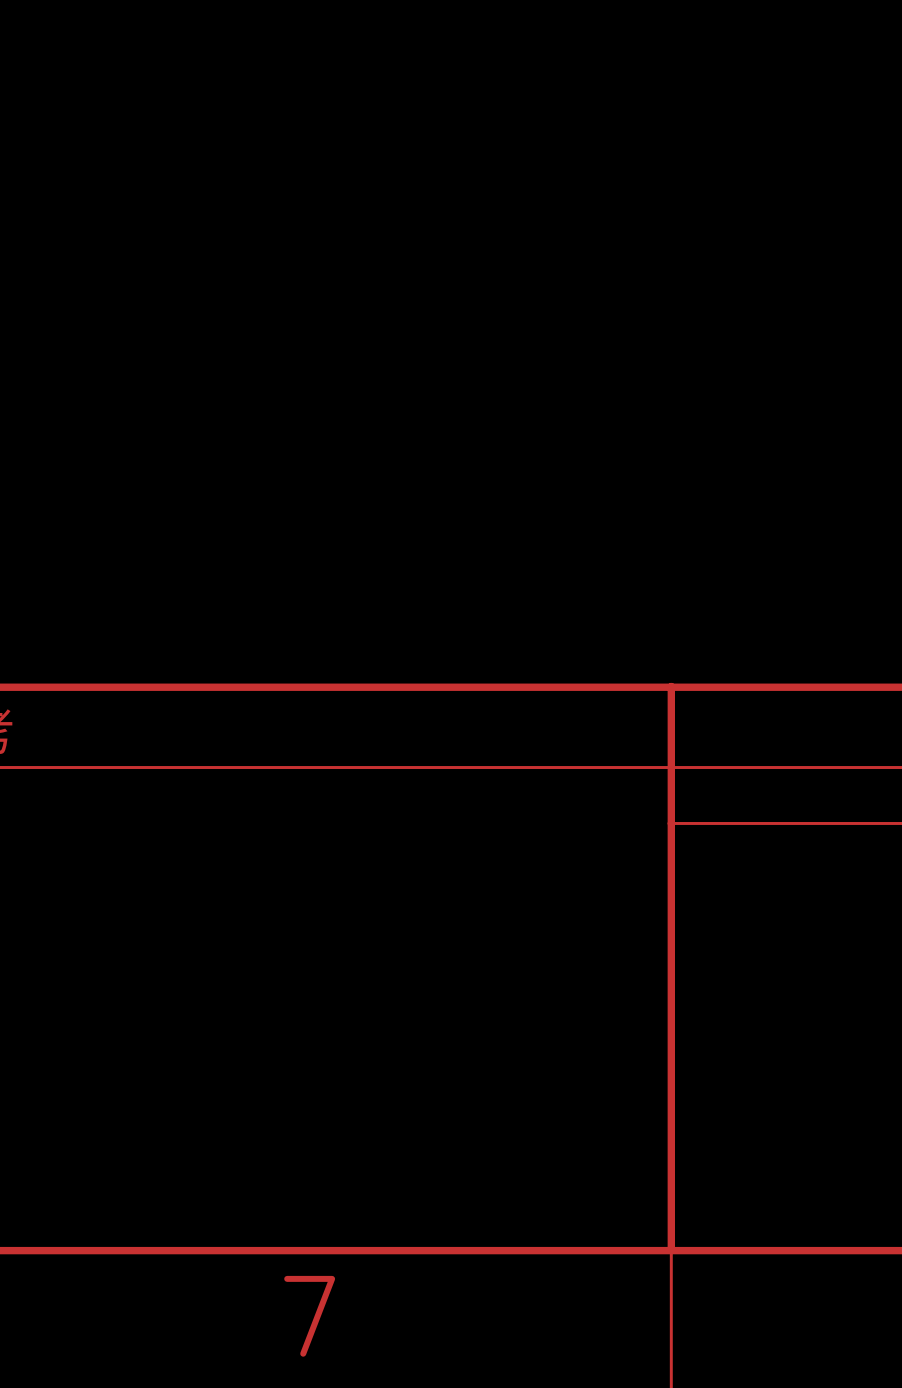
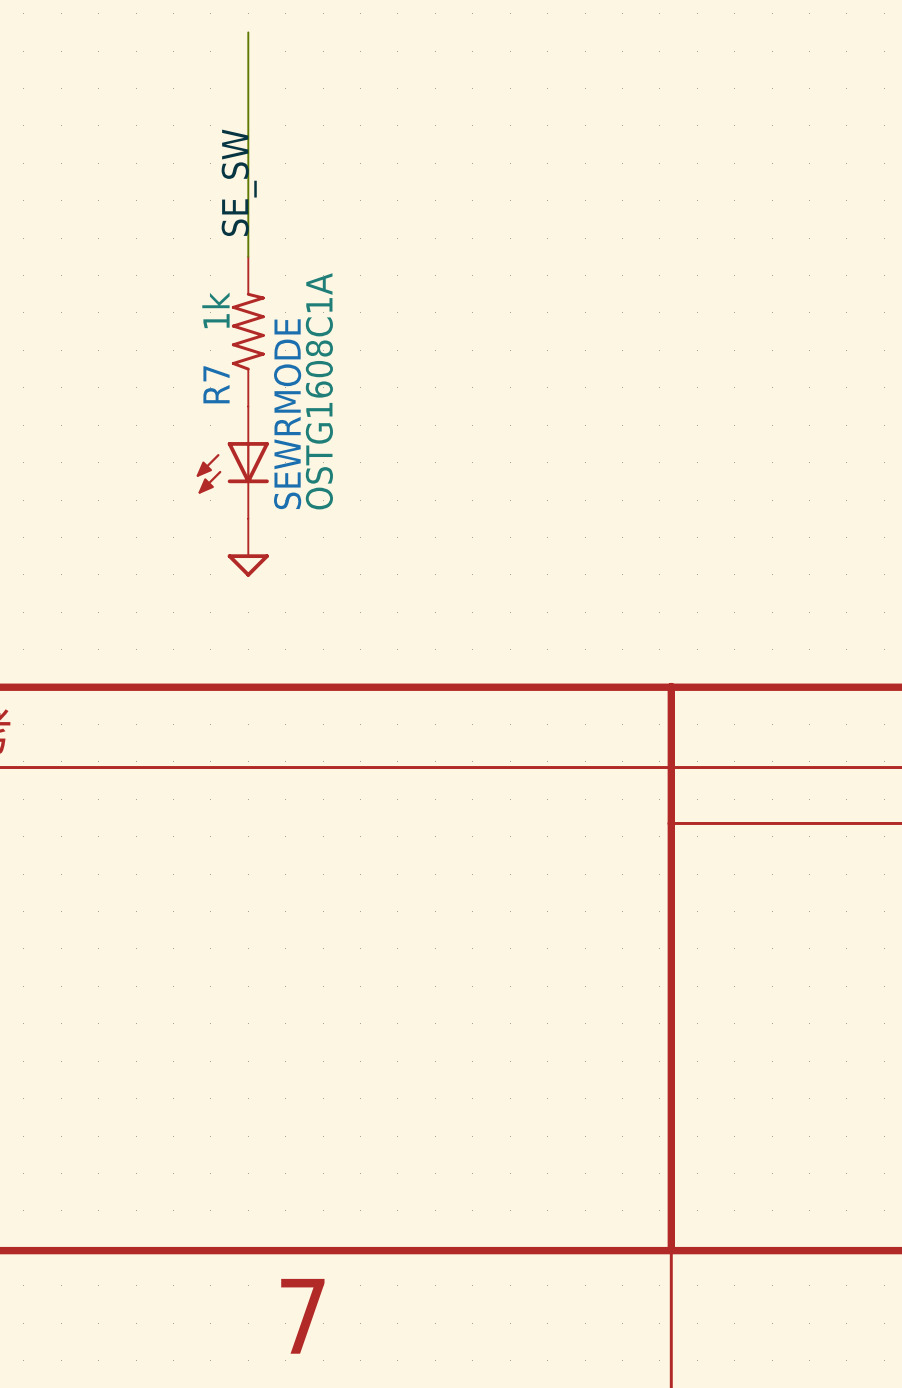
wire: none -> (248, 32) (248, 256)
label: none -> SE_SW (239, 182)
R7: none -> 1k (248, 331)
SEWRMODE: none -> OSTG1608C1A (232, 462)
power symbol: none -> (248, 547)

